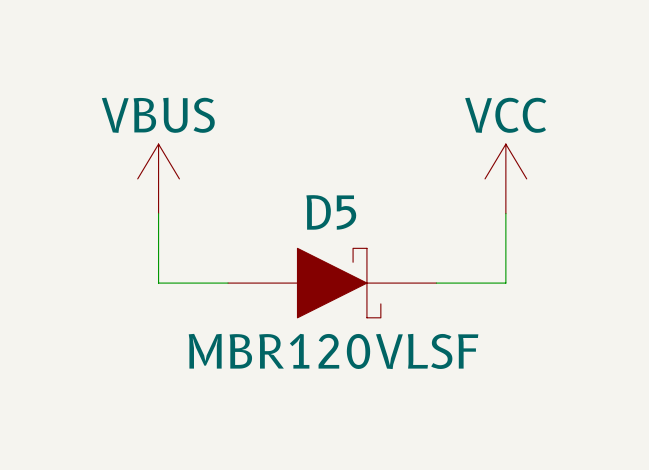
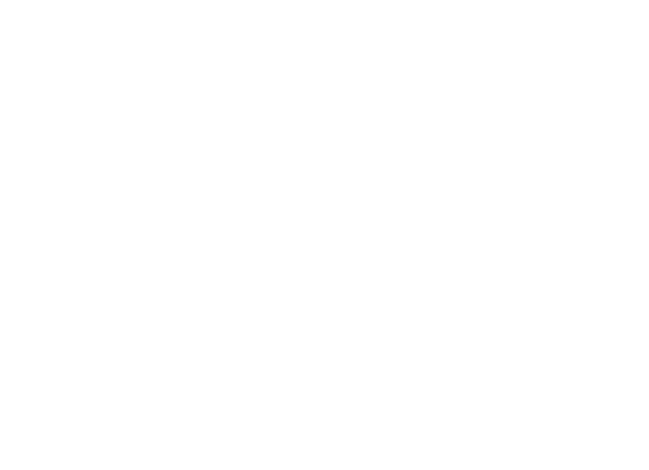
power symbol: VBUS (158, 178) -> none
power symbol: VCC (505, 178) -> none
wire: (158, 213) (158, 283) (228, 283) -> none
wire: (505, 213) (505, 283) (436, 283) -> none
D5: MBR120VLSF (332, 283) -> none

